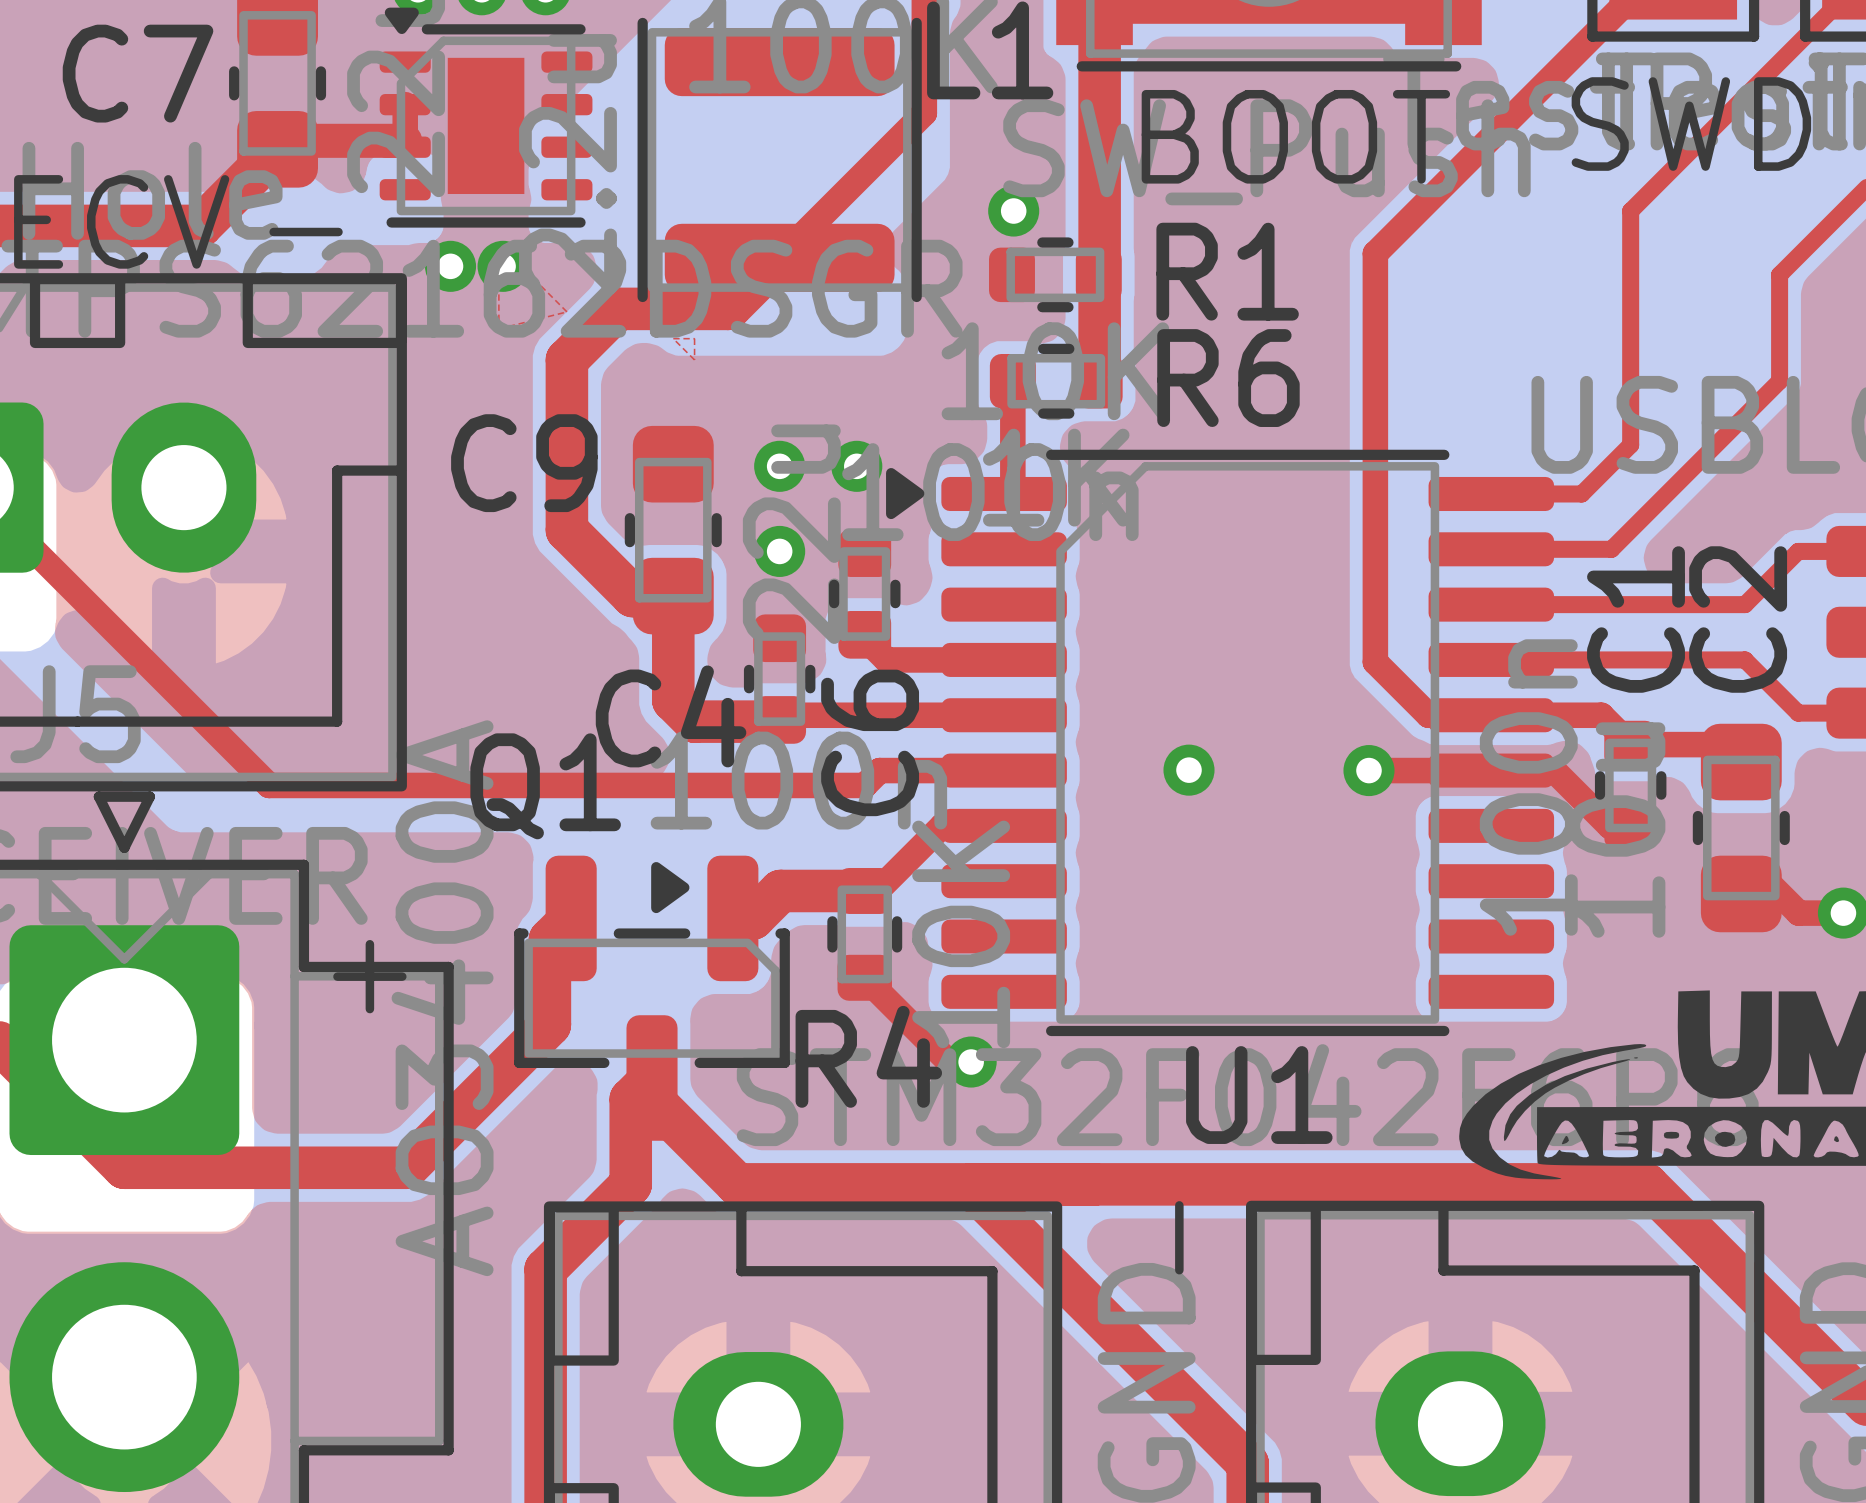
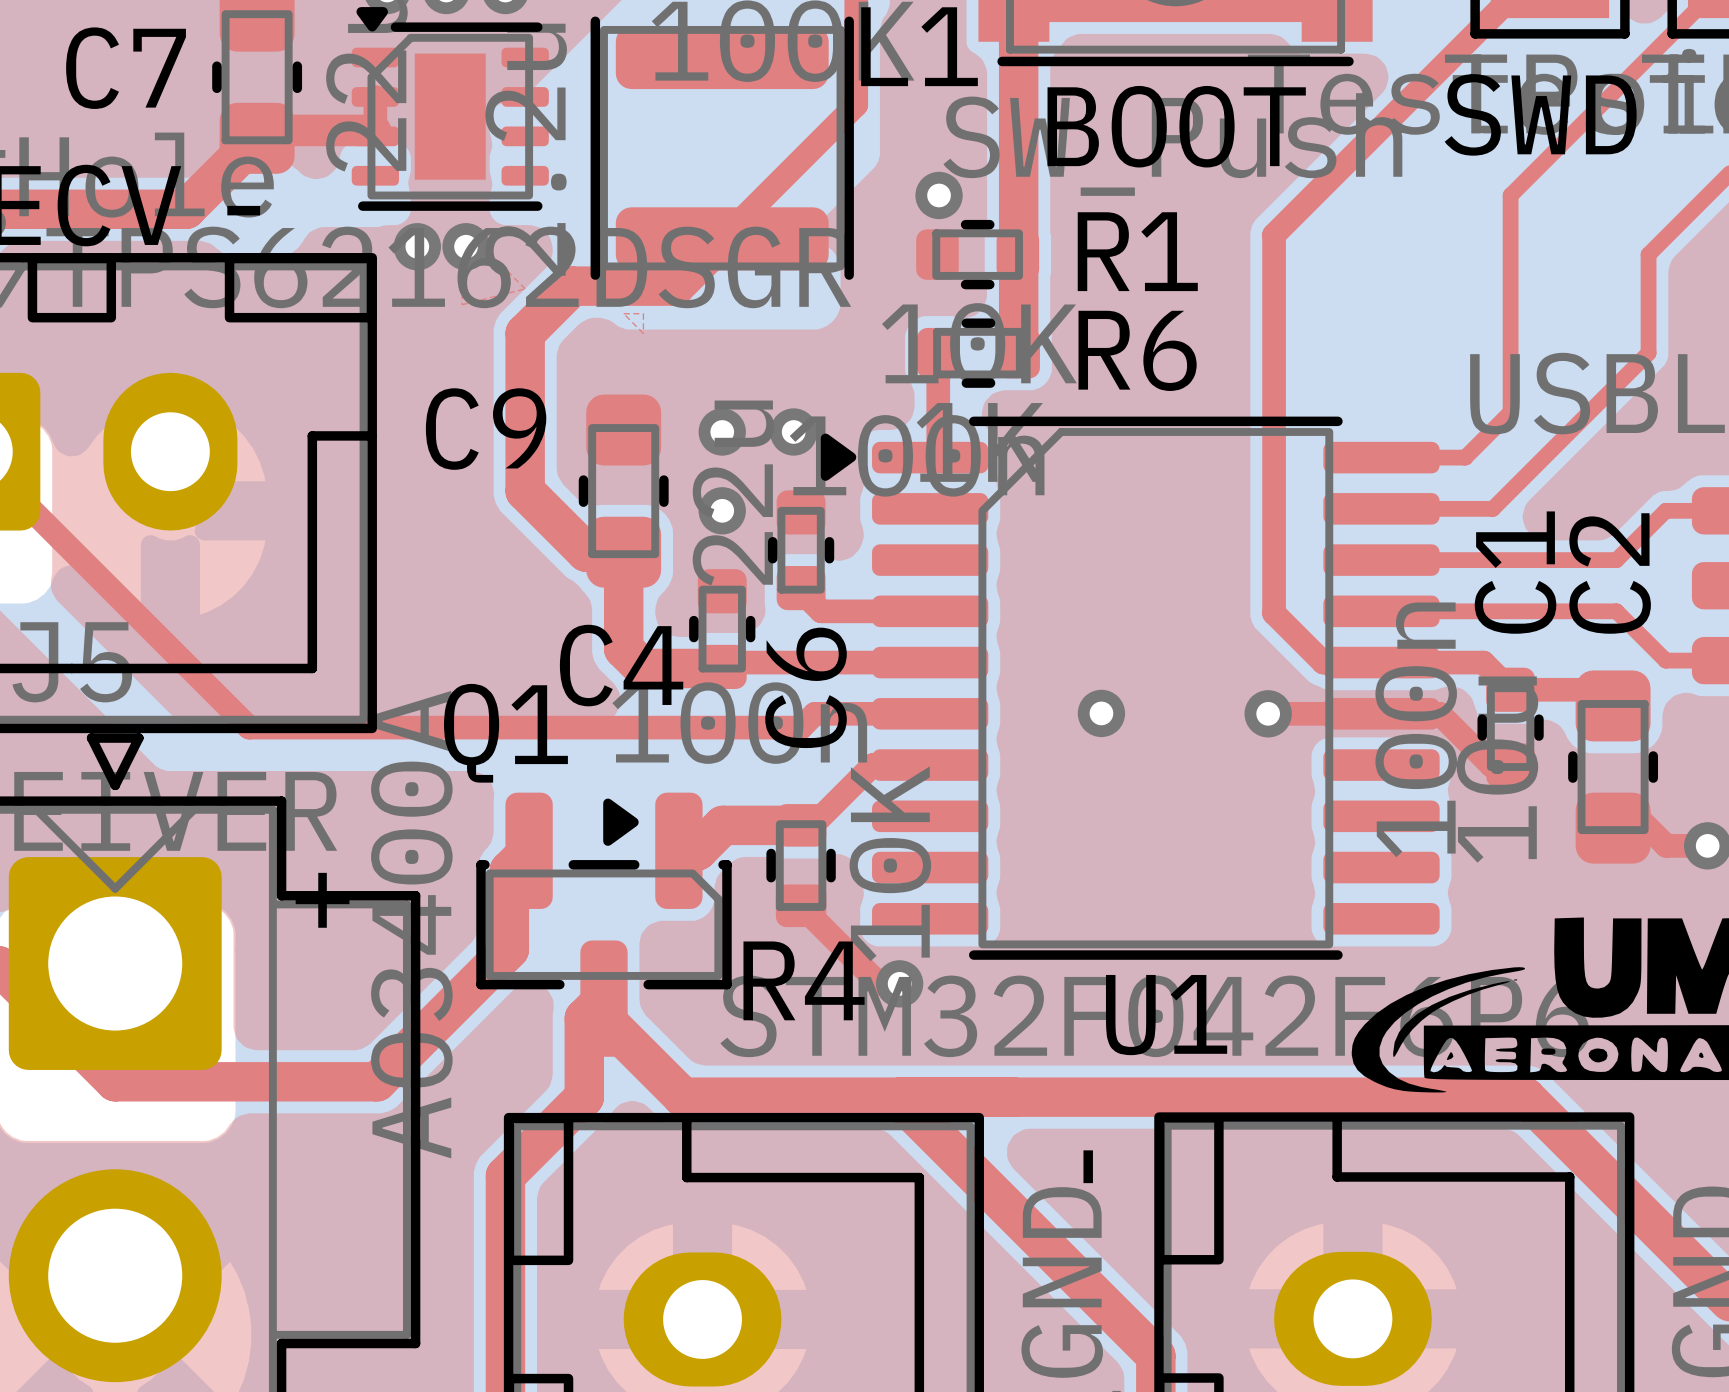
text position: - (306, 232) -> - (243, 210)

